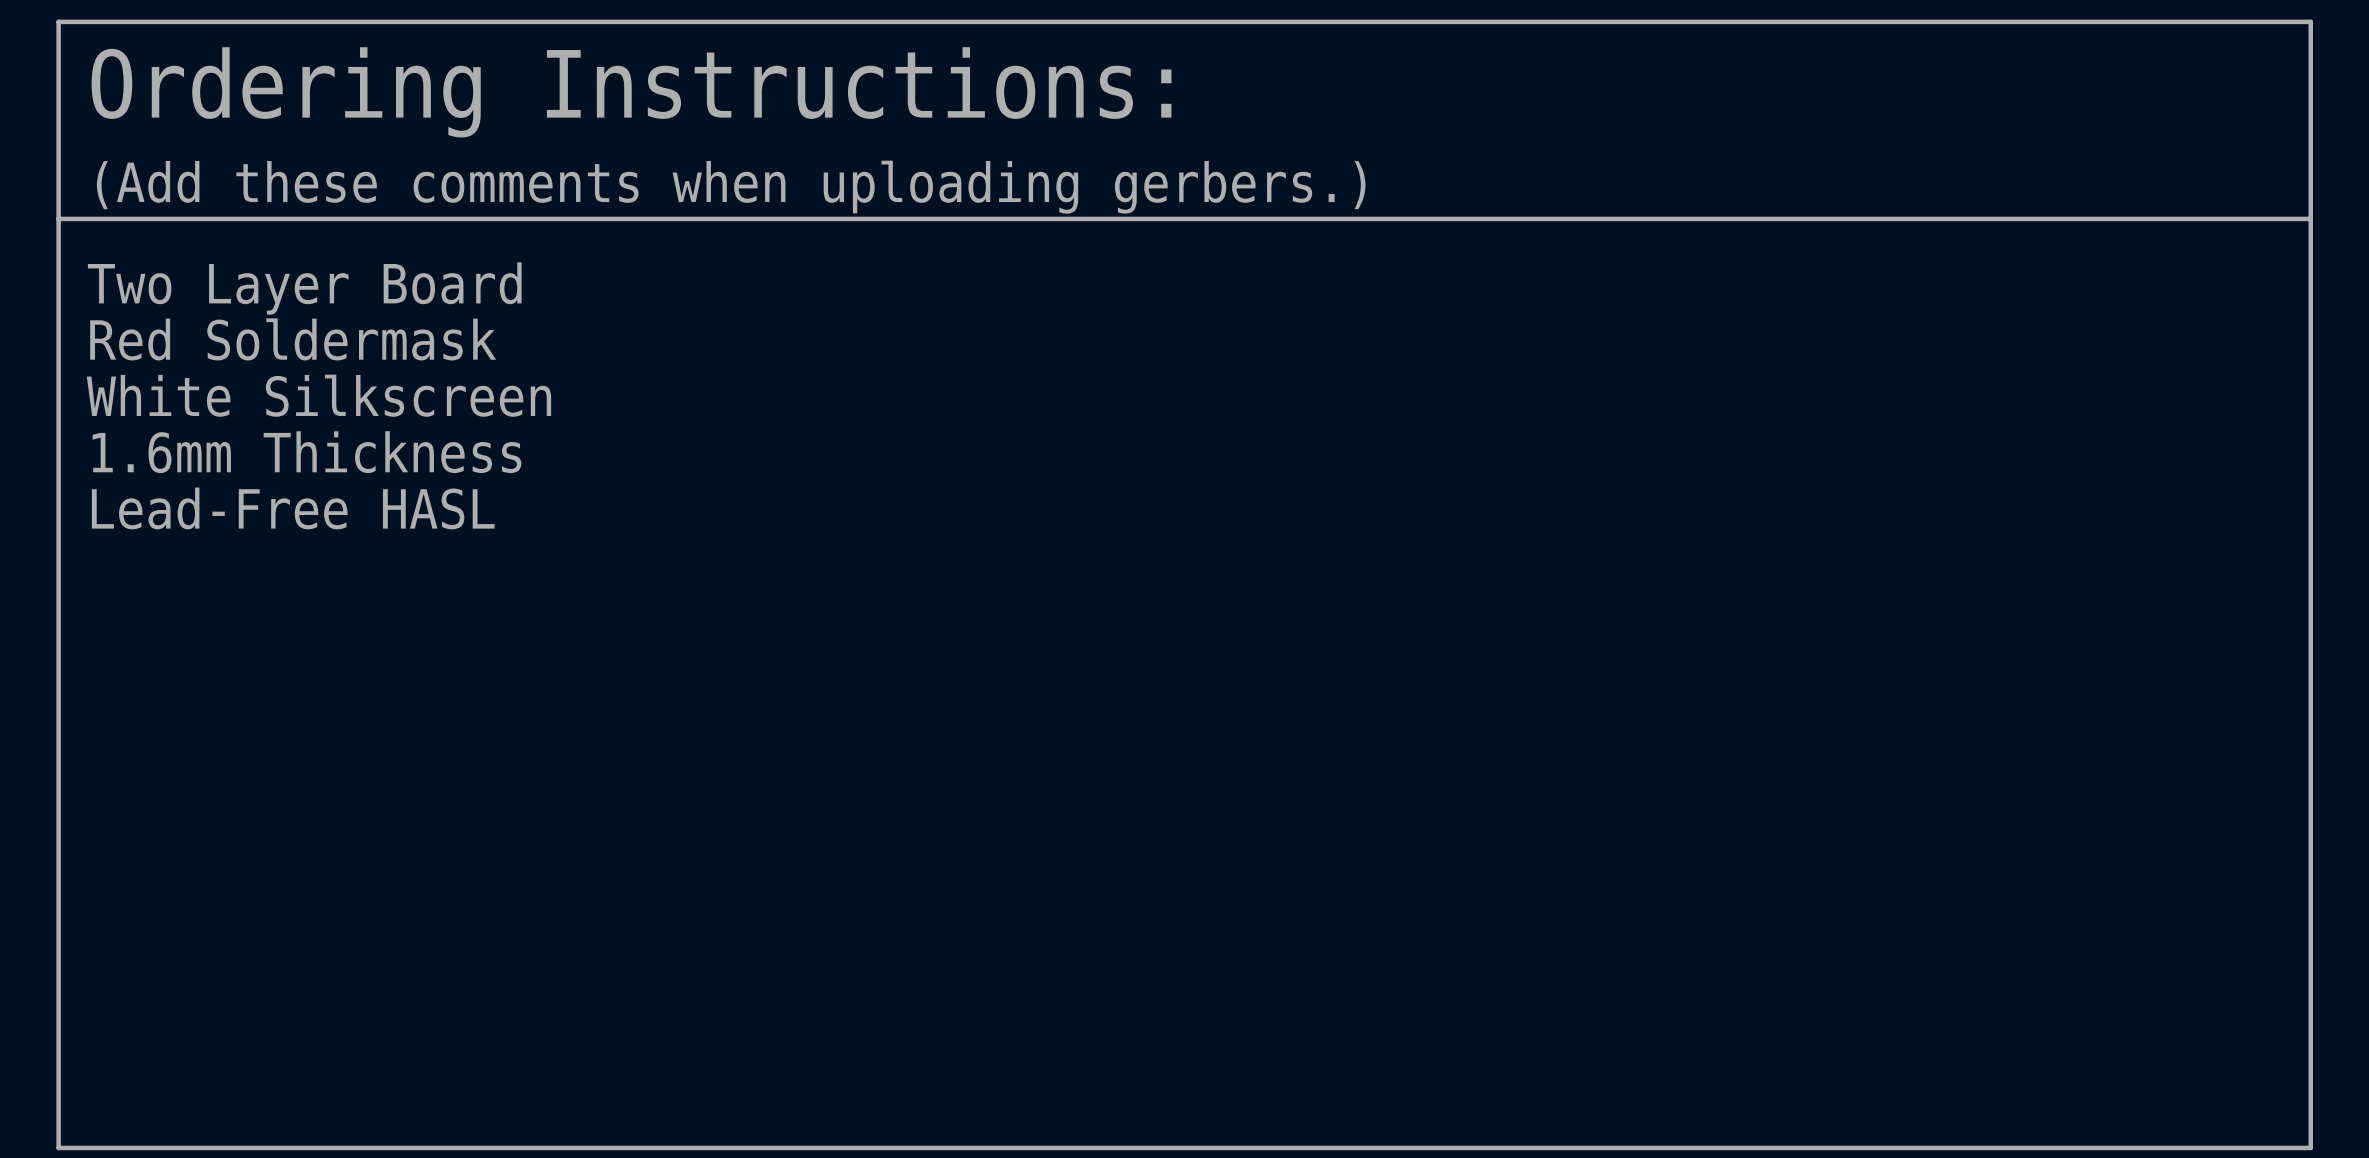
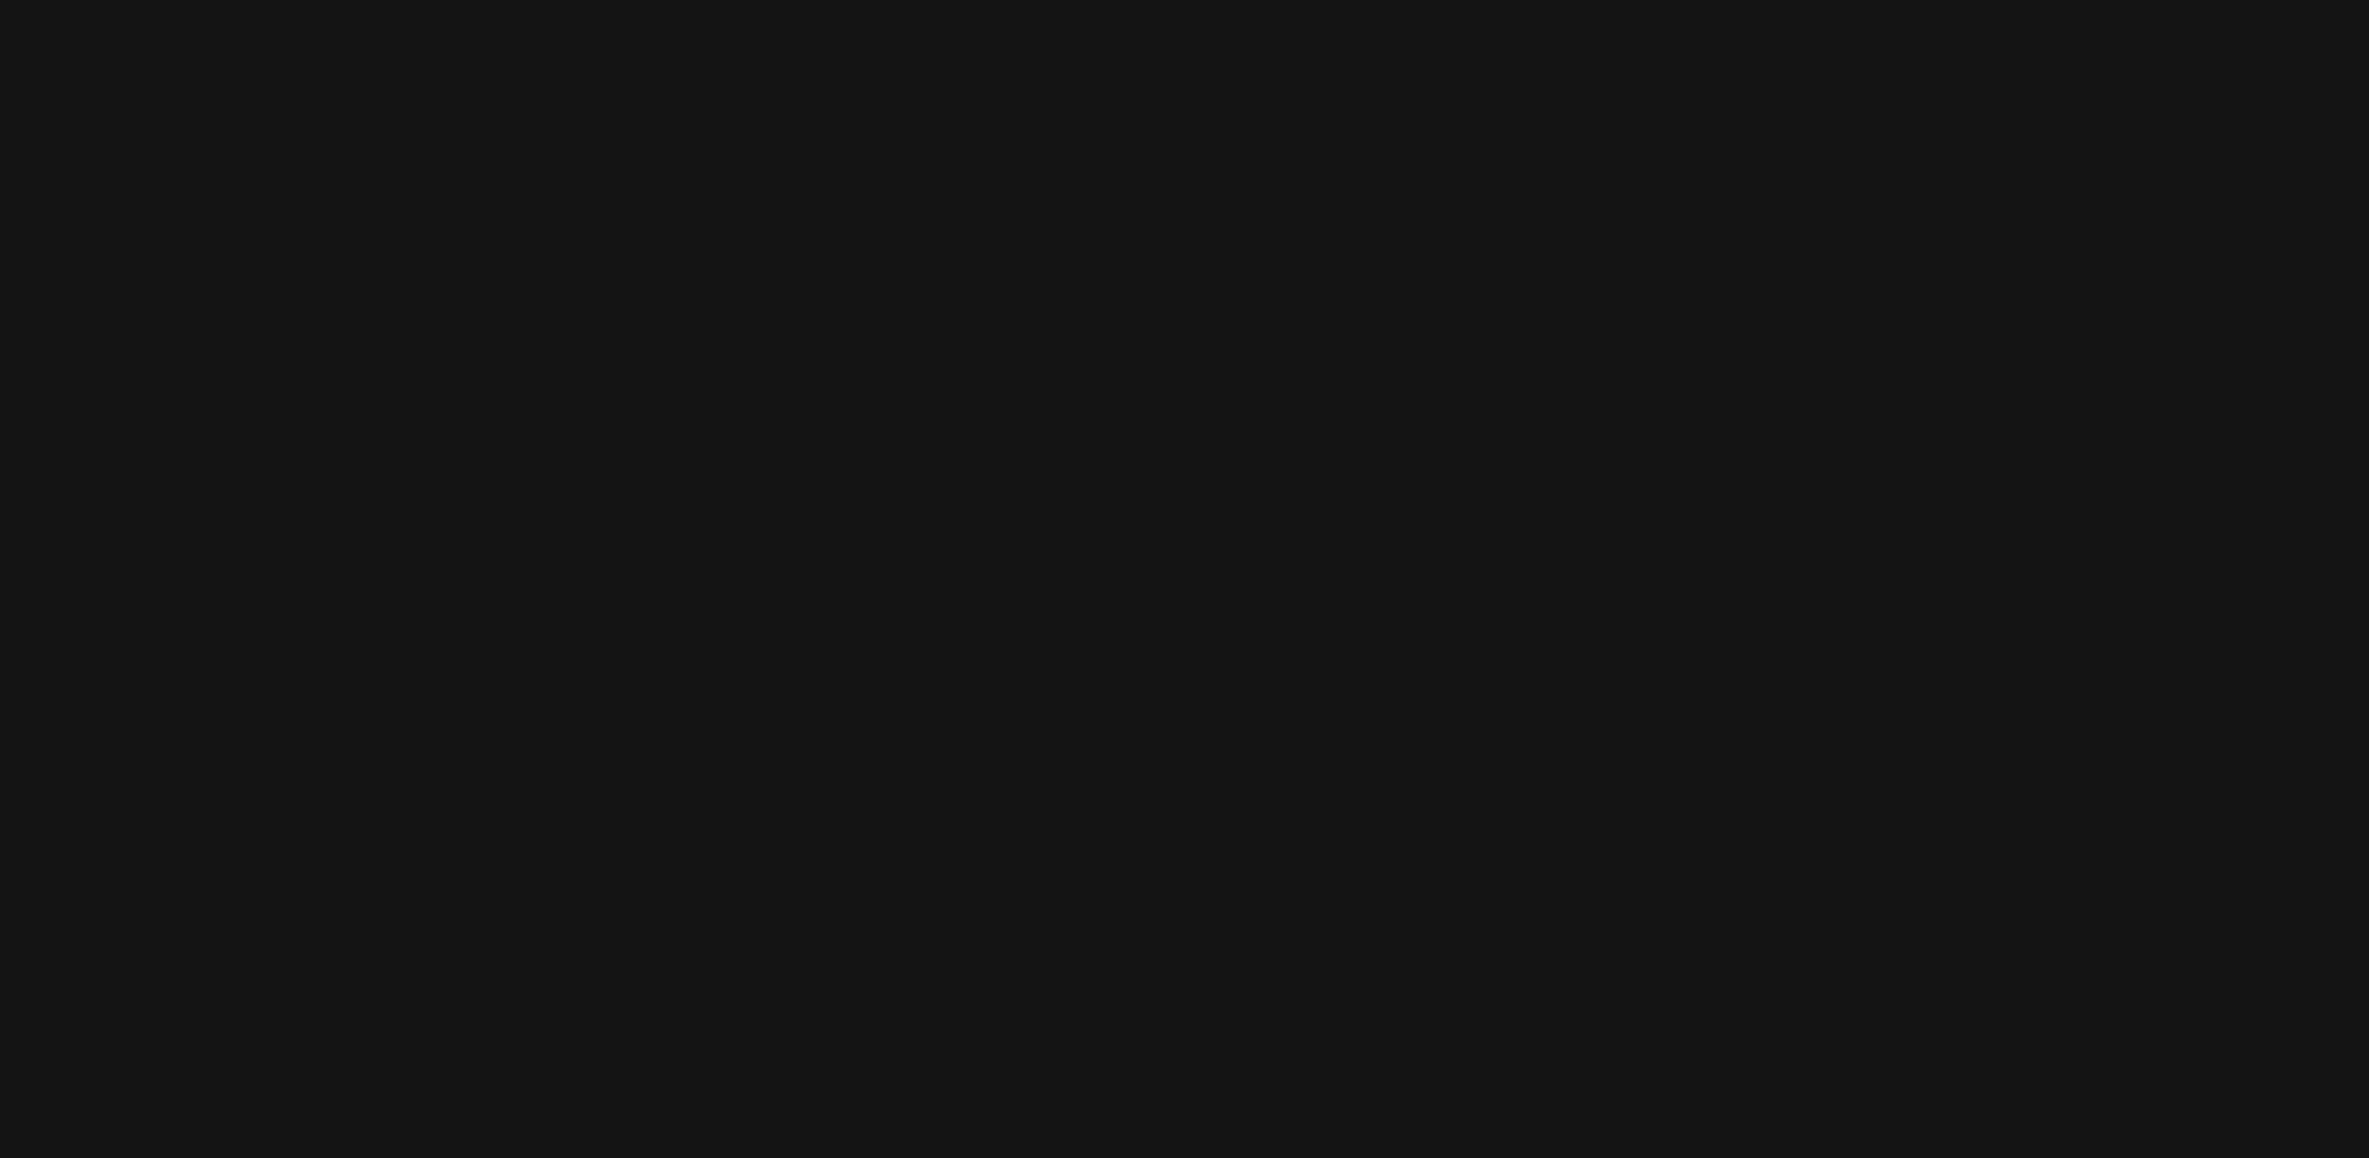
drawing: [56, 19, 2313, 1151] -> none
text: Two Layer Board (304, 288) -> none
text: Red Soldermask (293, 339) -> none
text: White Silkscreen (318, 395) -> none
text: 1.6mm Thickness (306, 452) -> none
text: Lead-Free HASL (293, 508) -> none

